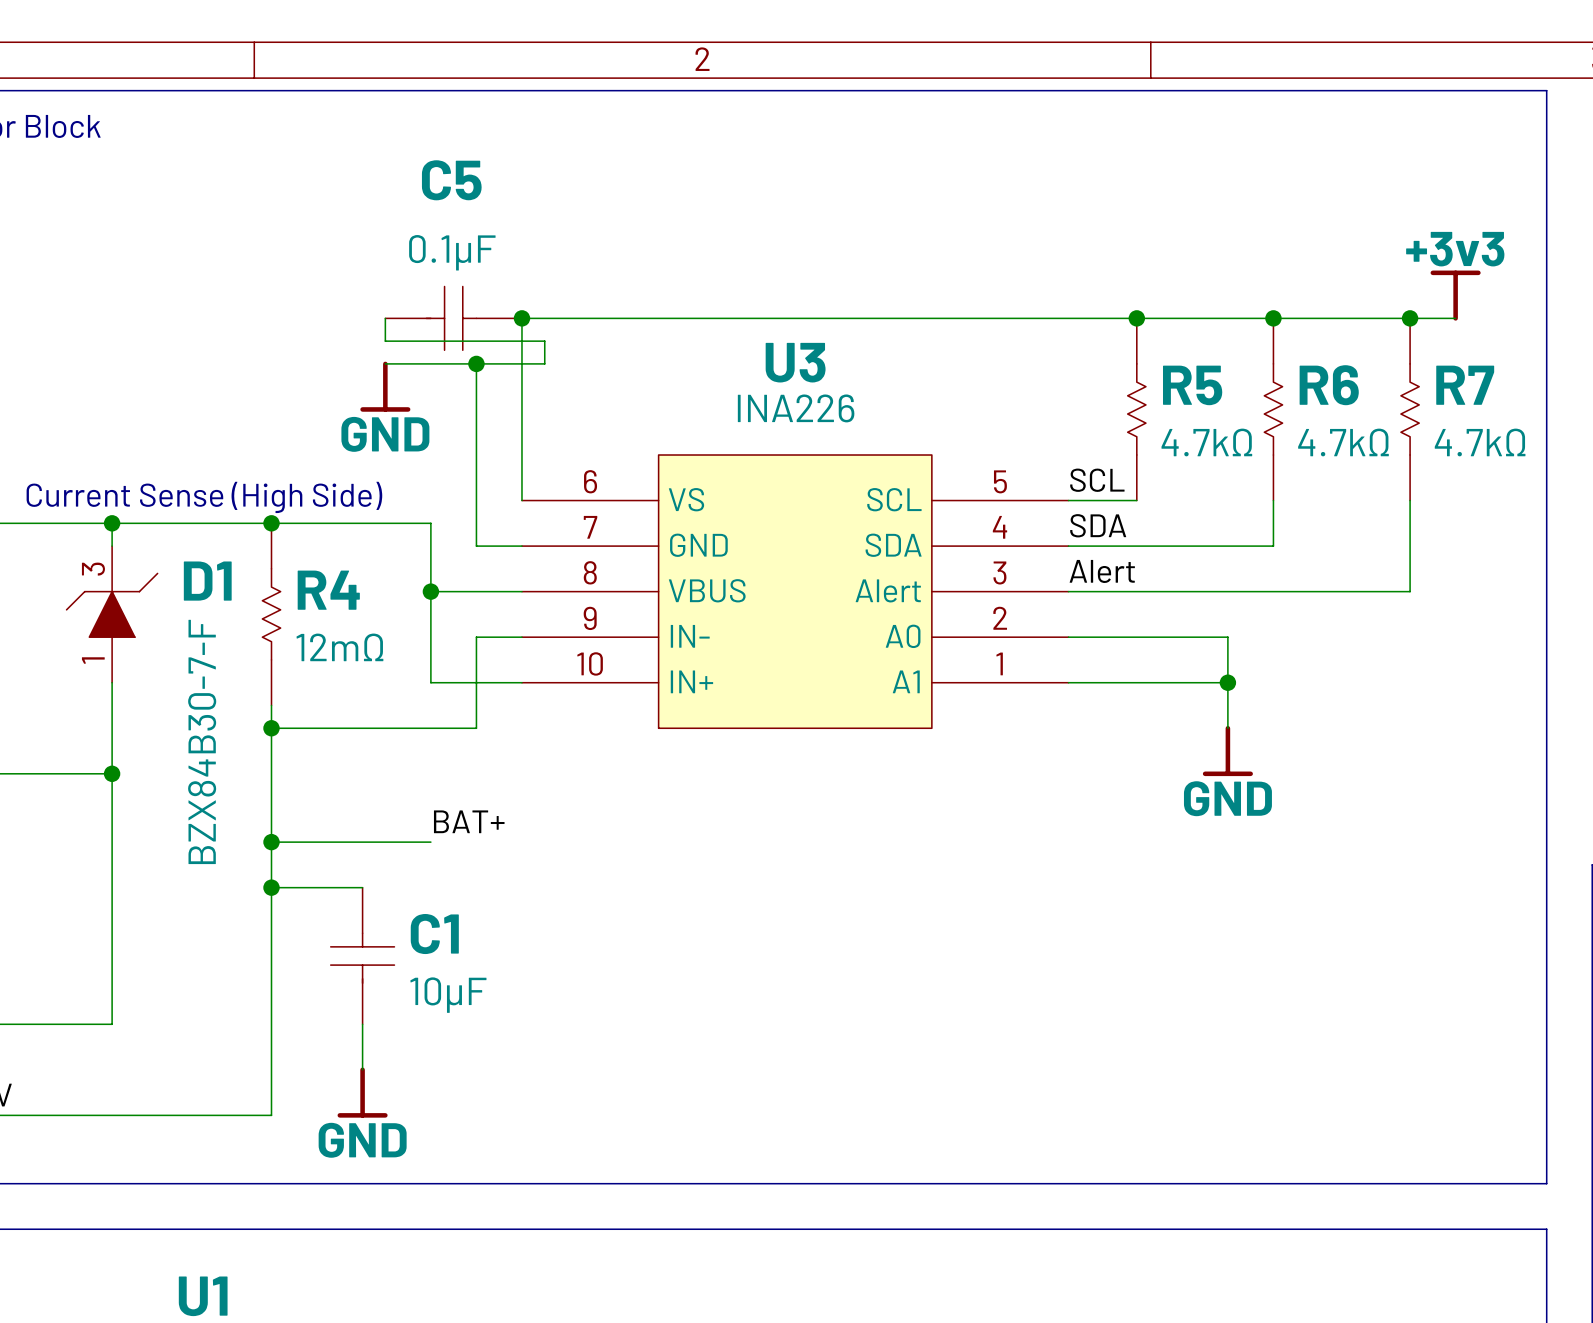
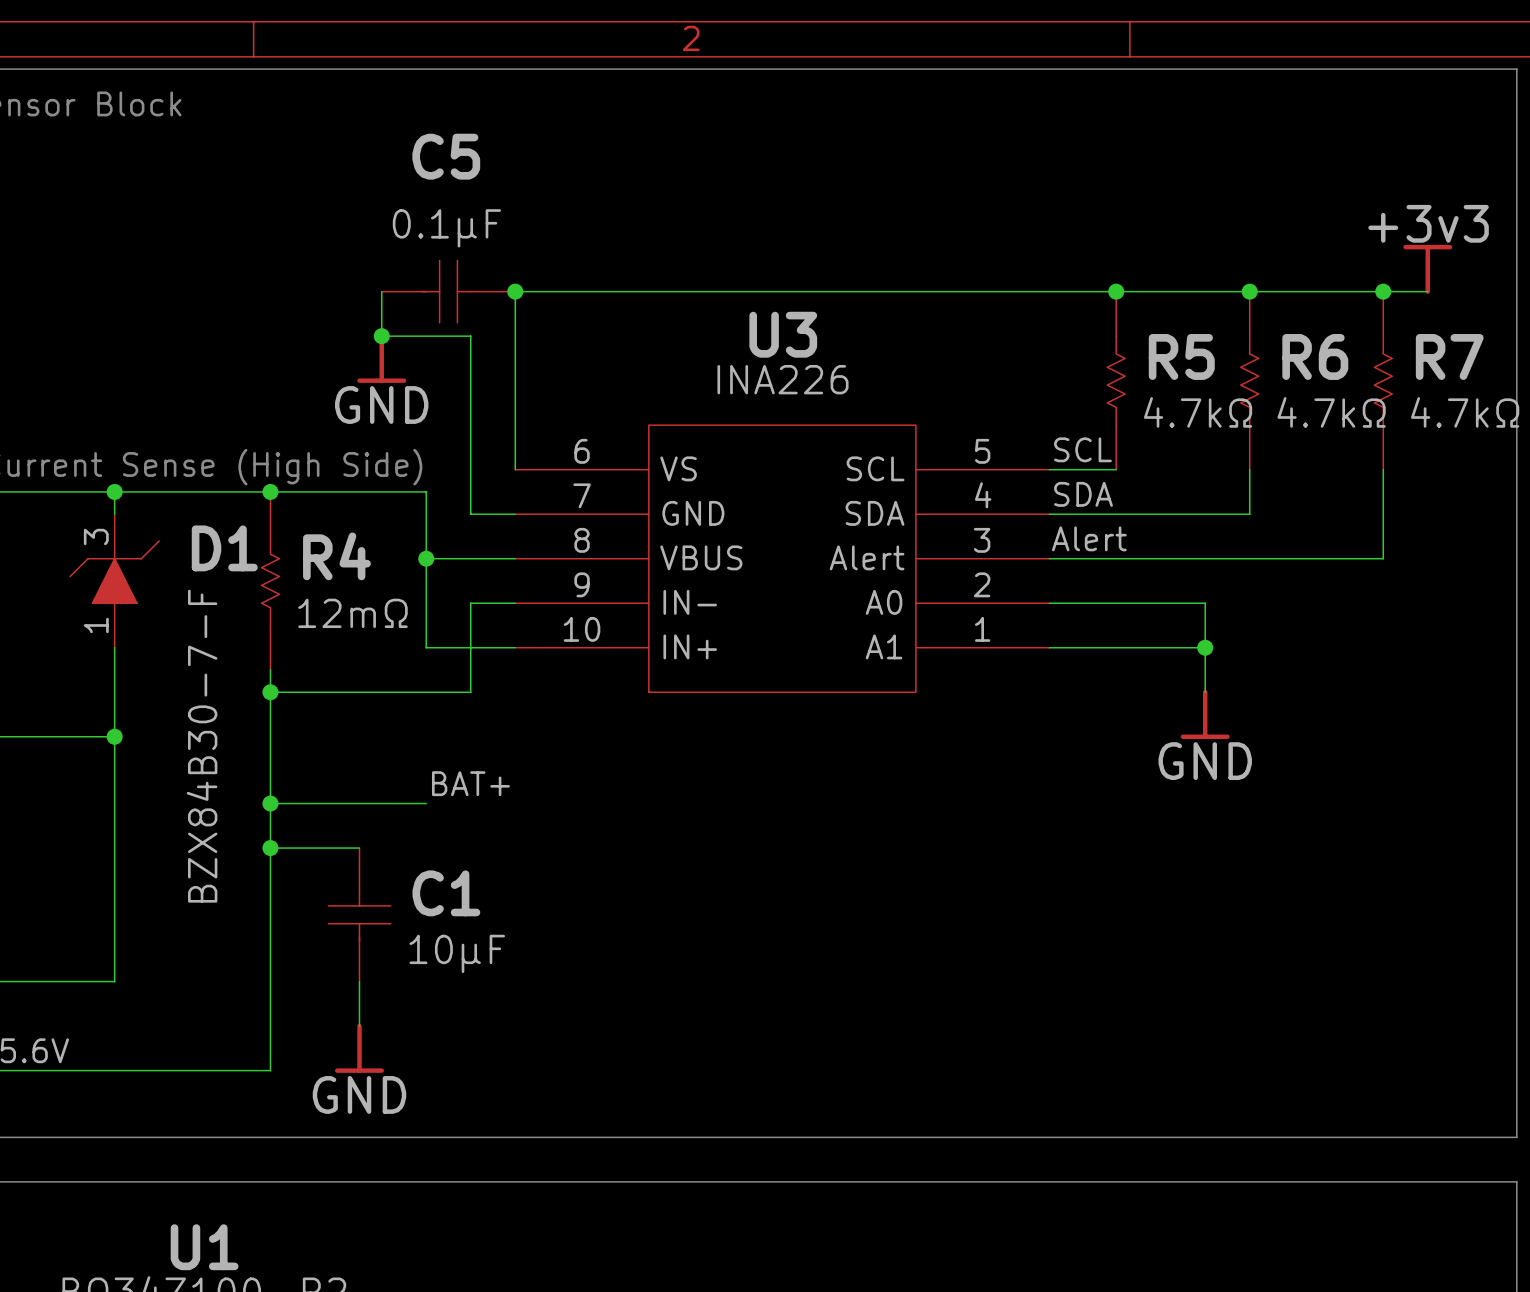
wire: (385, 341) (544, 341) (544, 363) (476, 363) -> (381, 313) (381, 336)
junction position: (476, 363) -> (381, 336)

